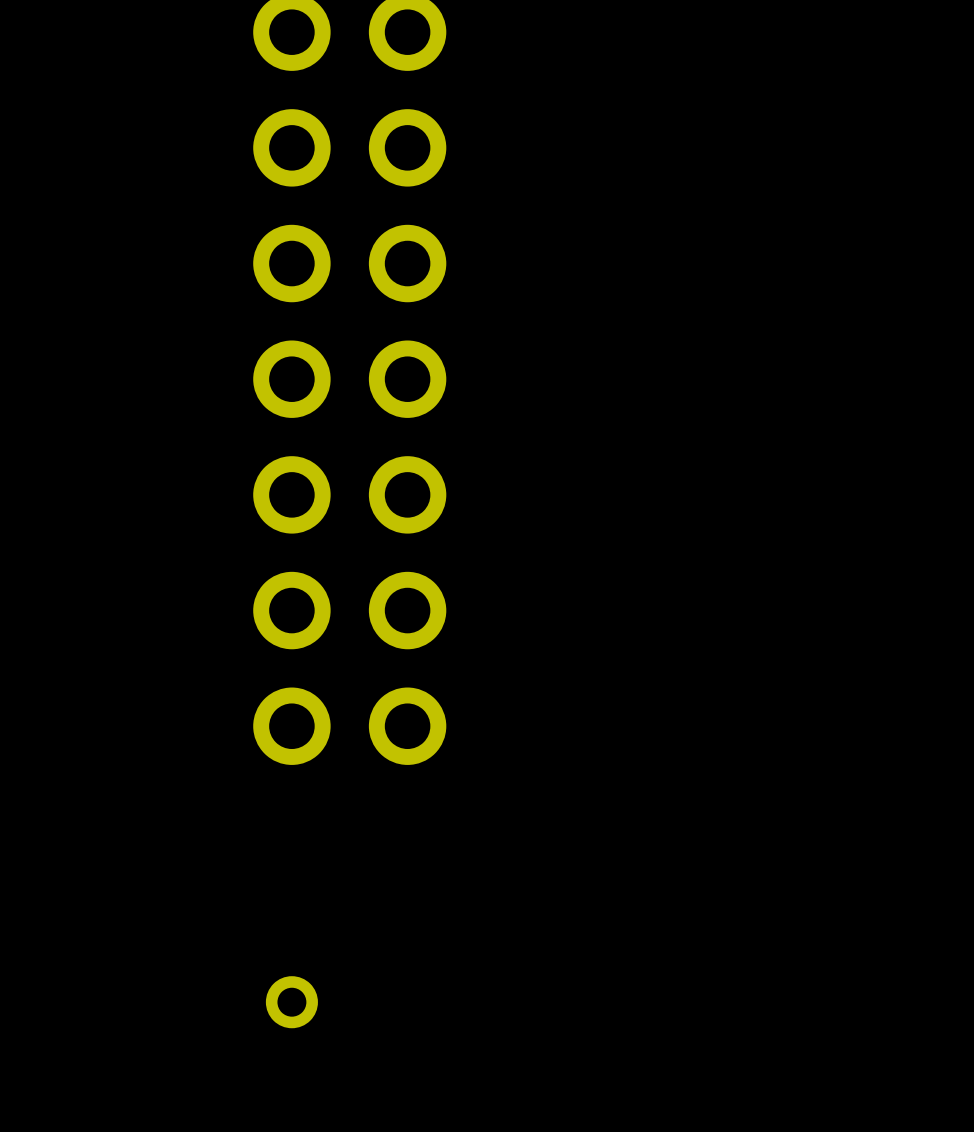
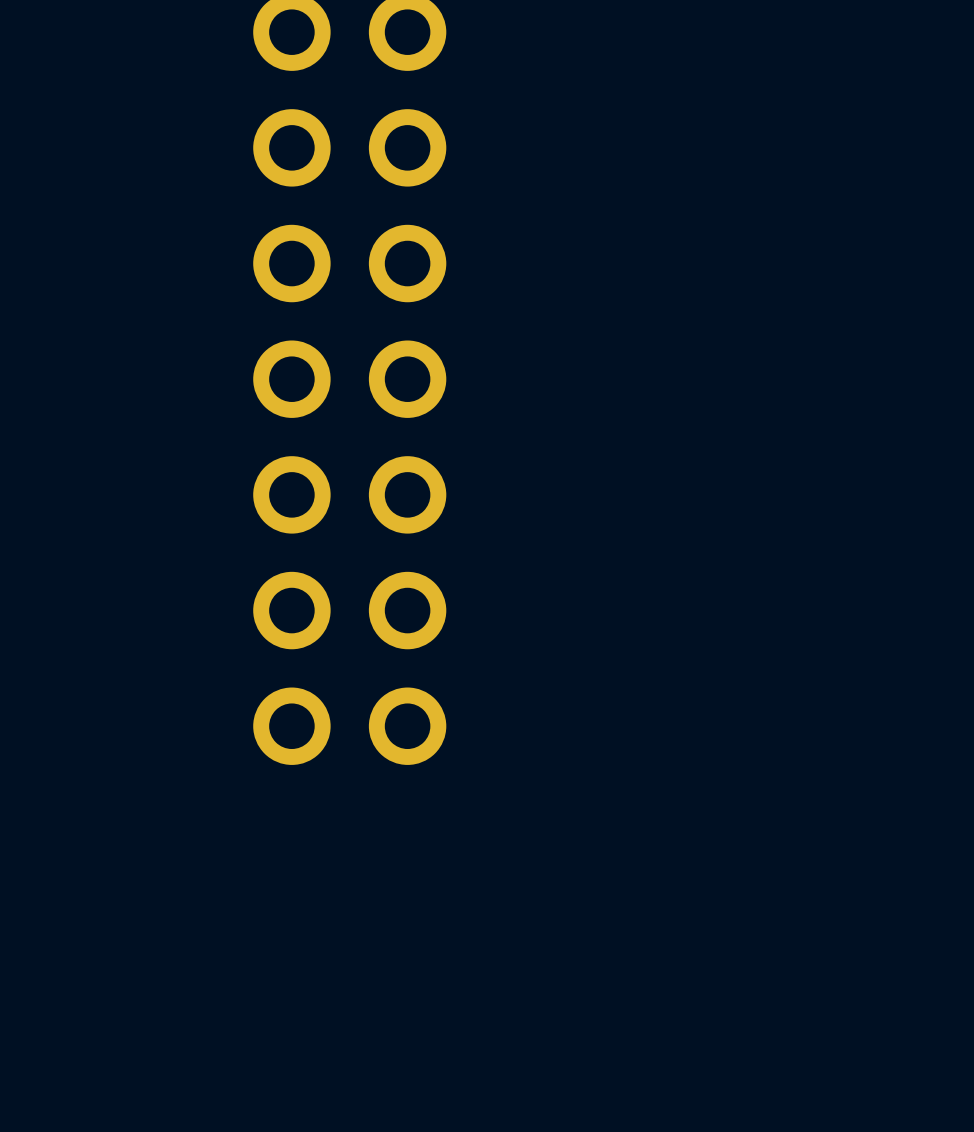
part: (291, 1002) -> none

